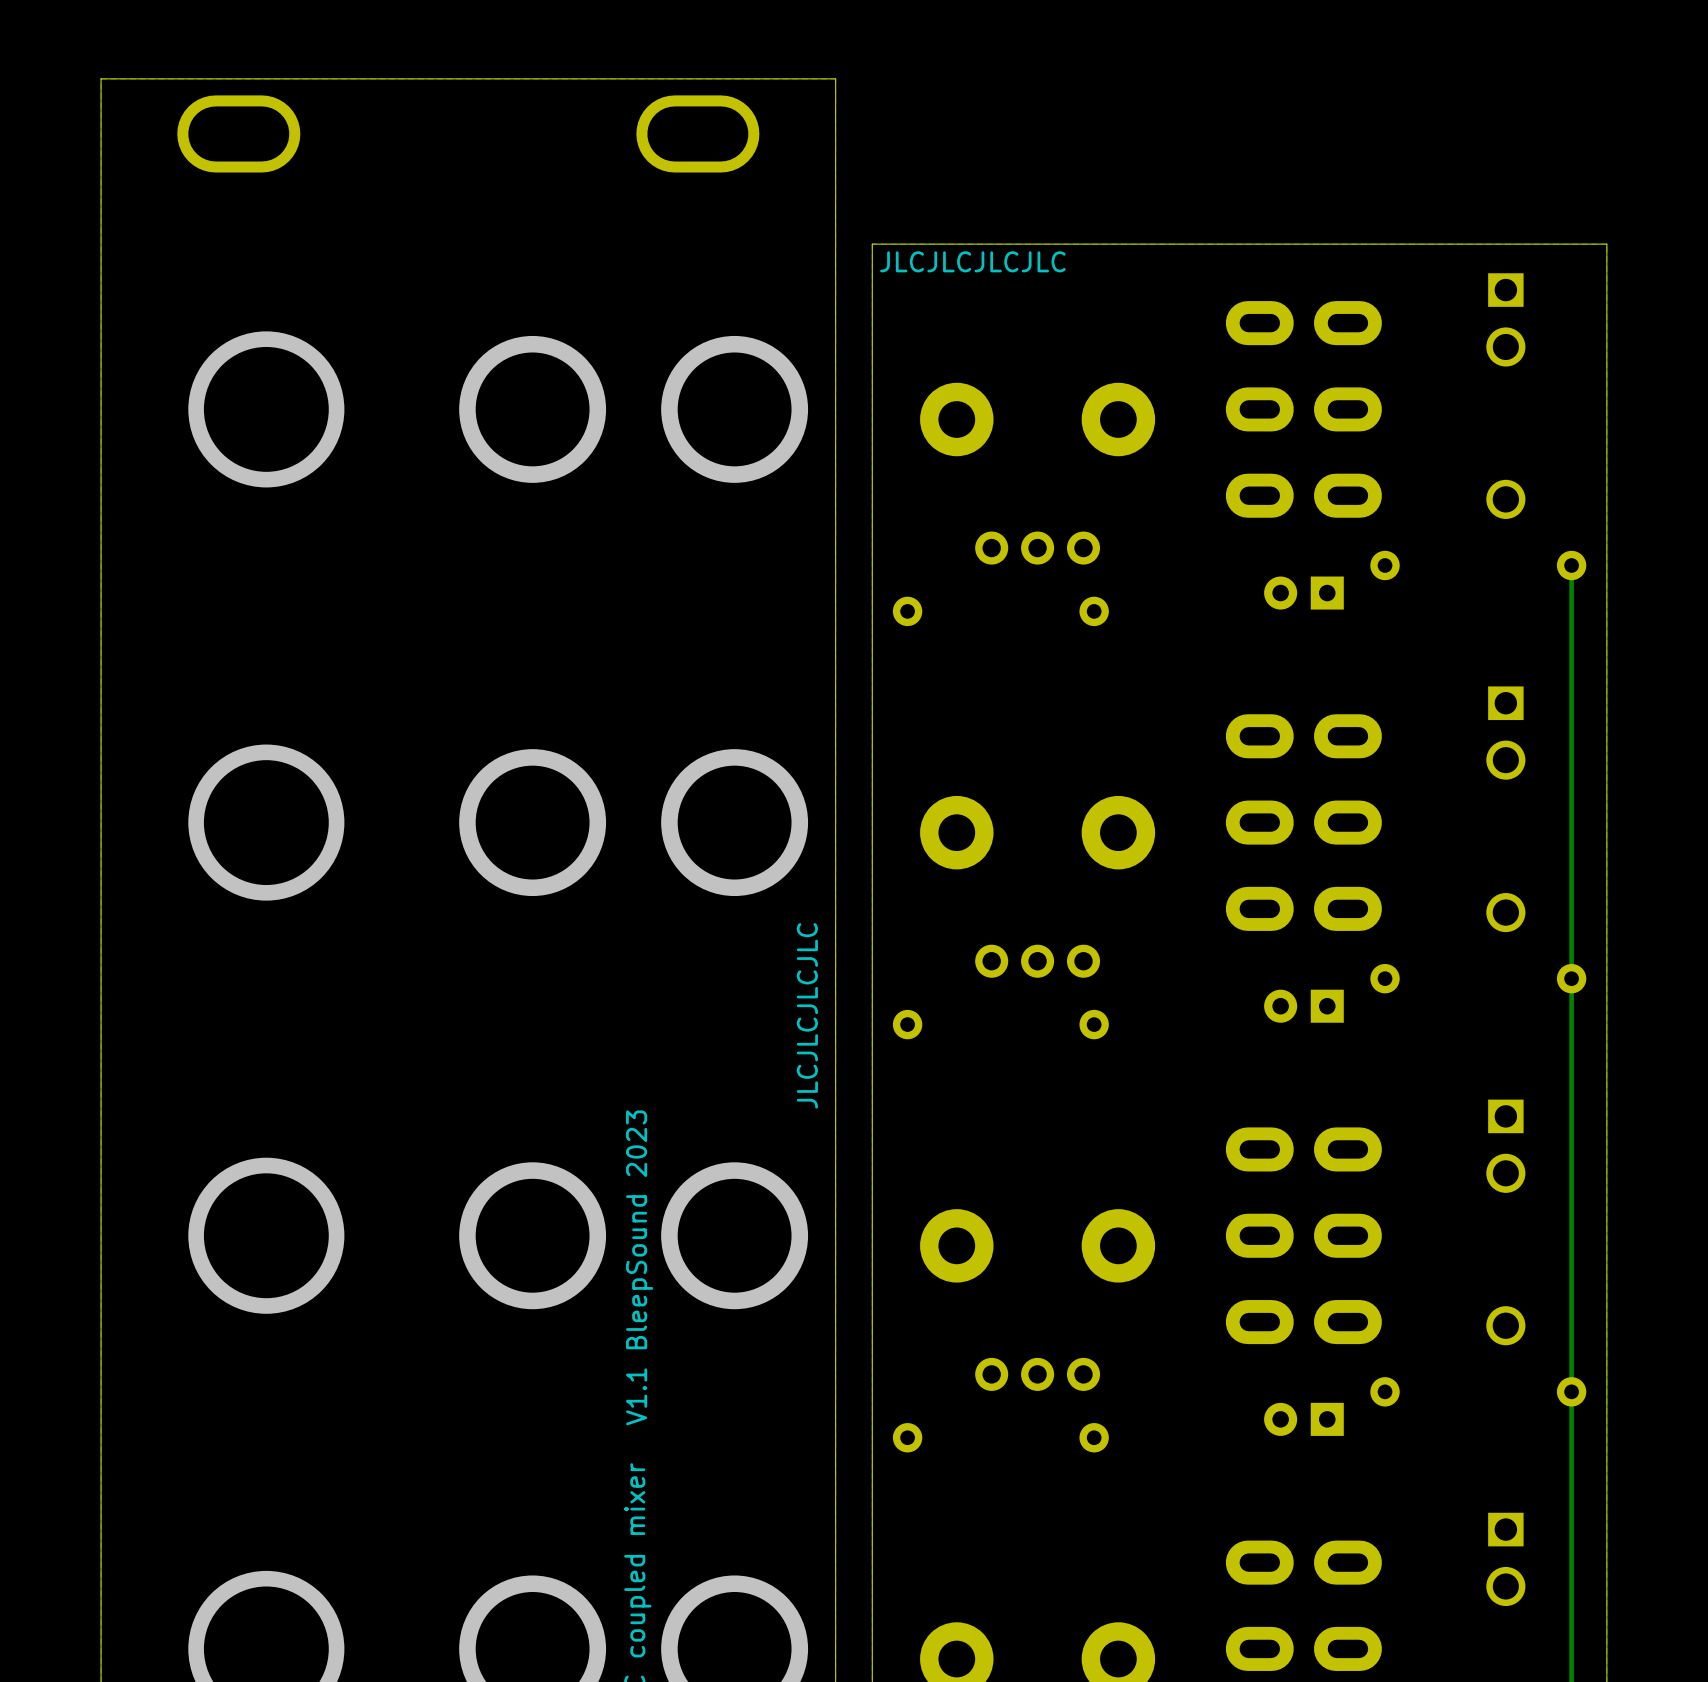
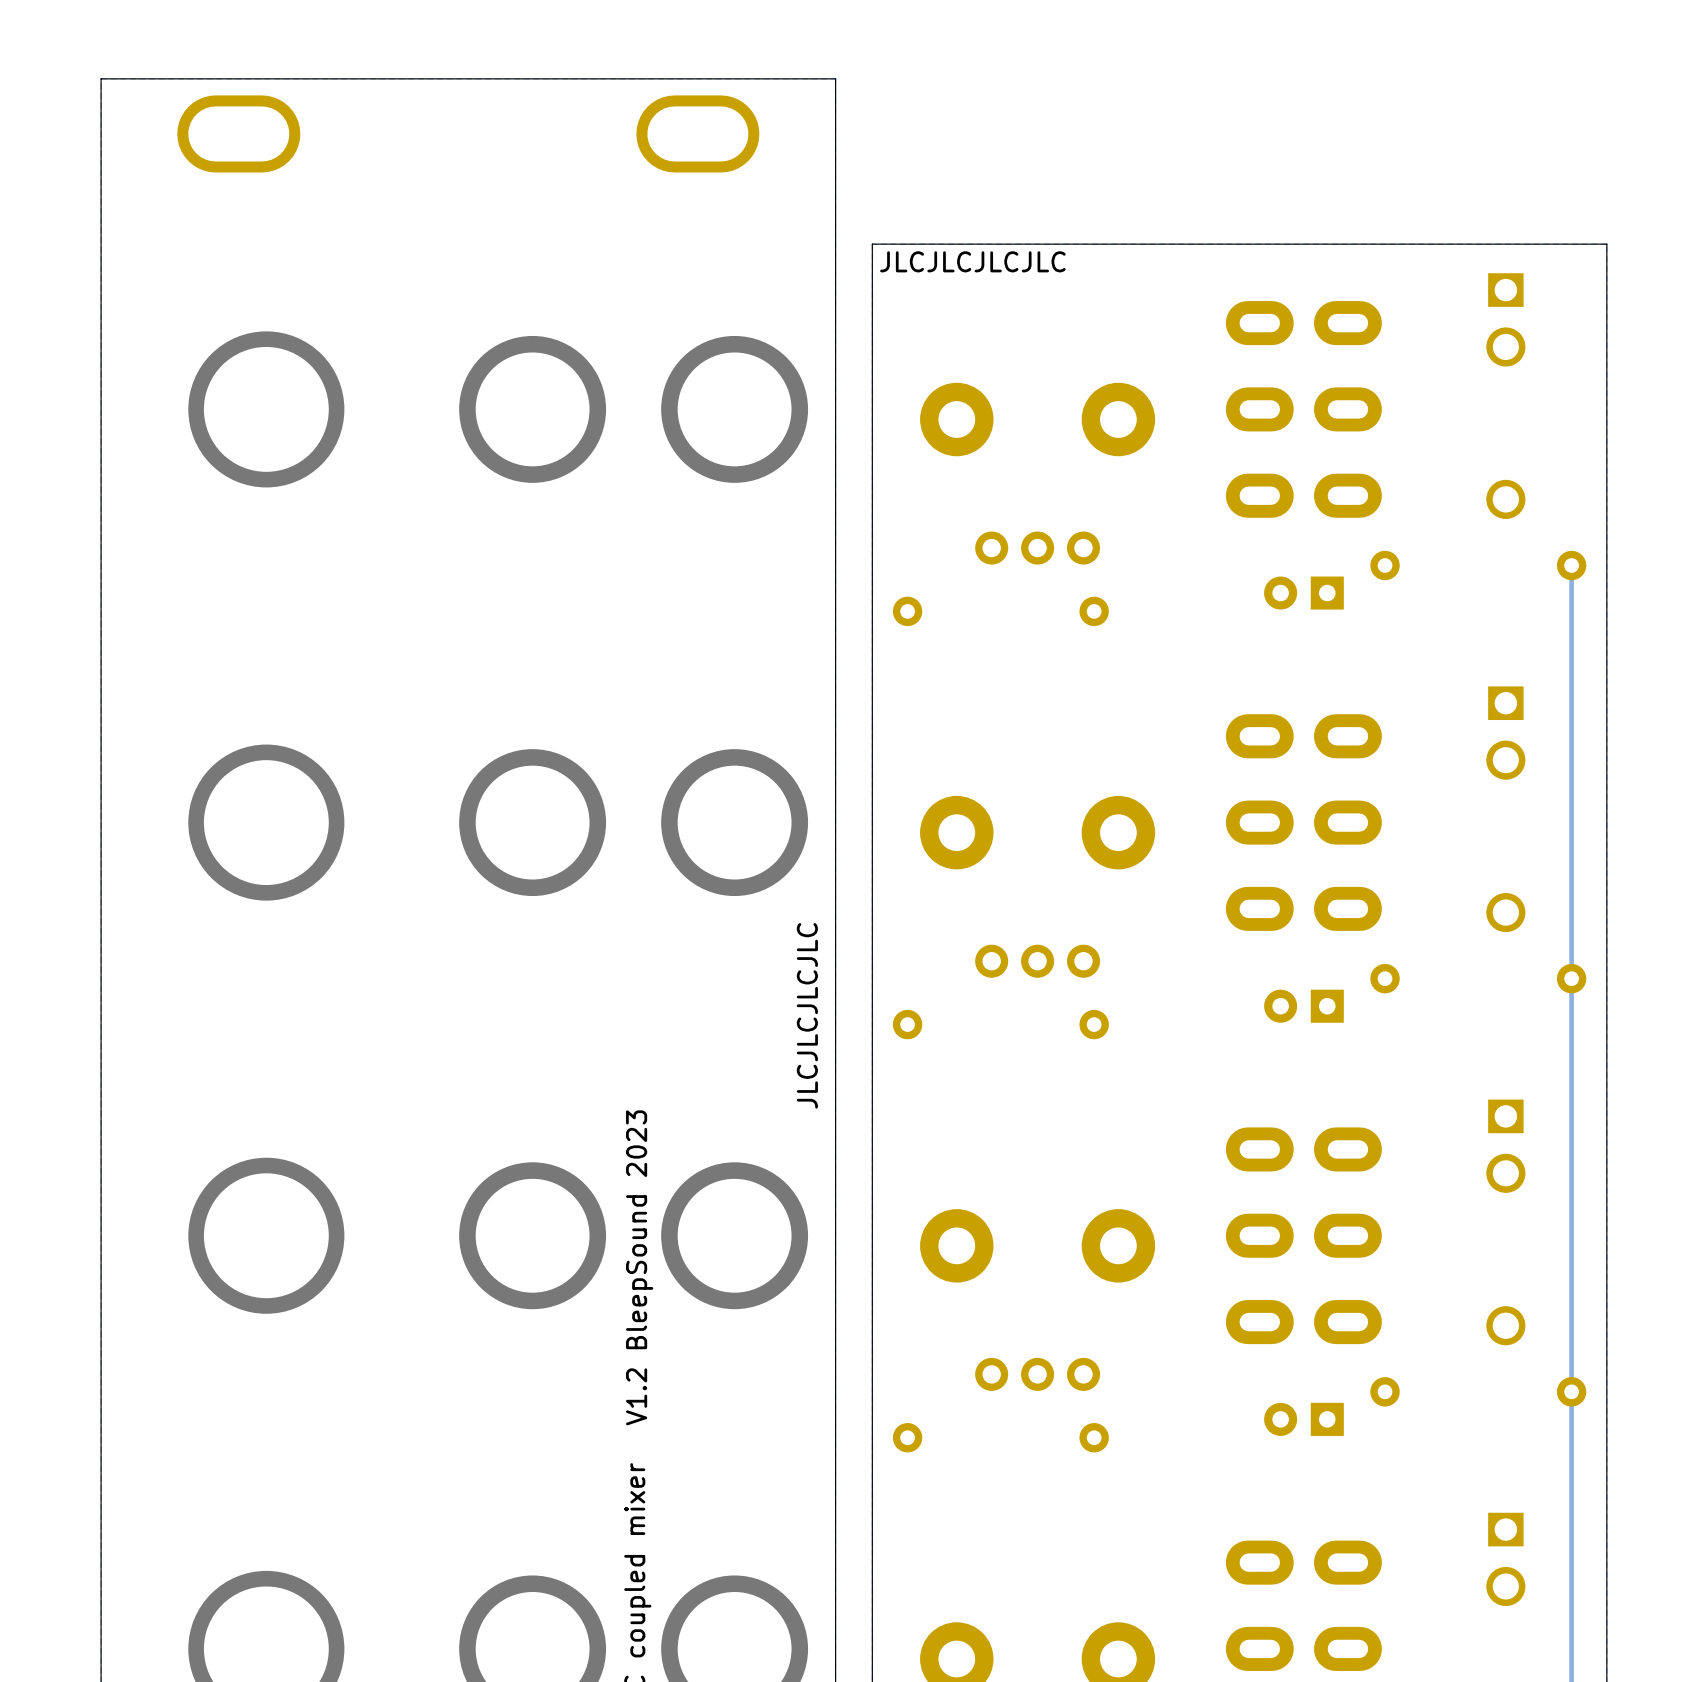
text: V1.1 BleepSound 2023 (639, 1267) -> V1.2 BleepSound 2023 (639, 1267)

